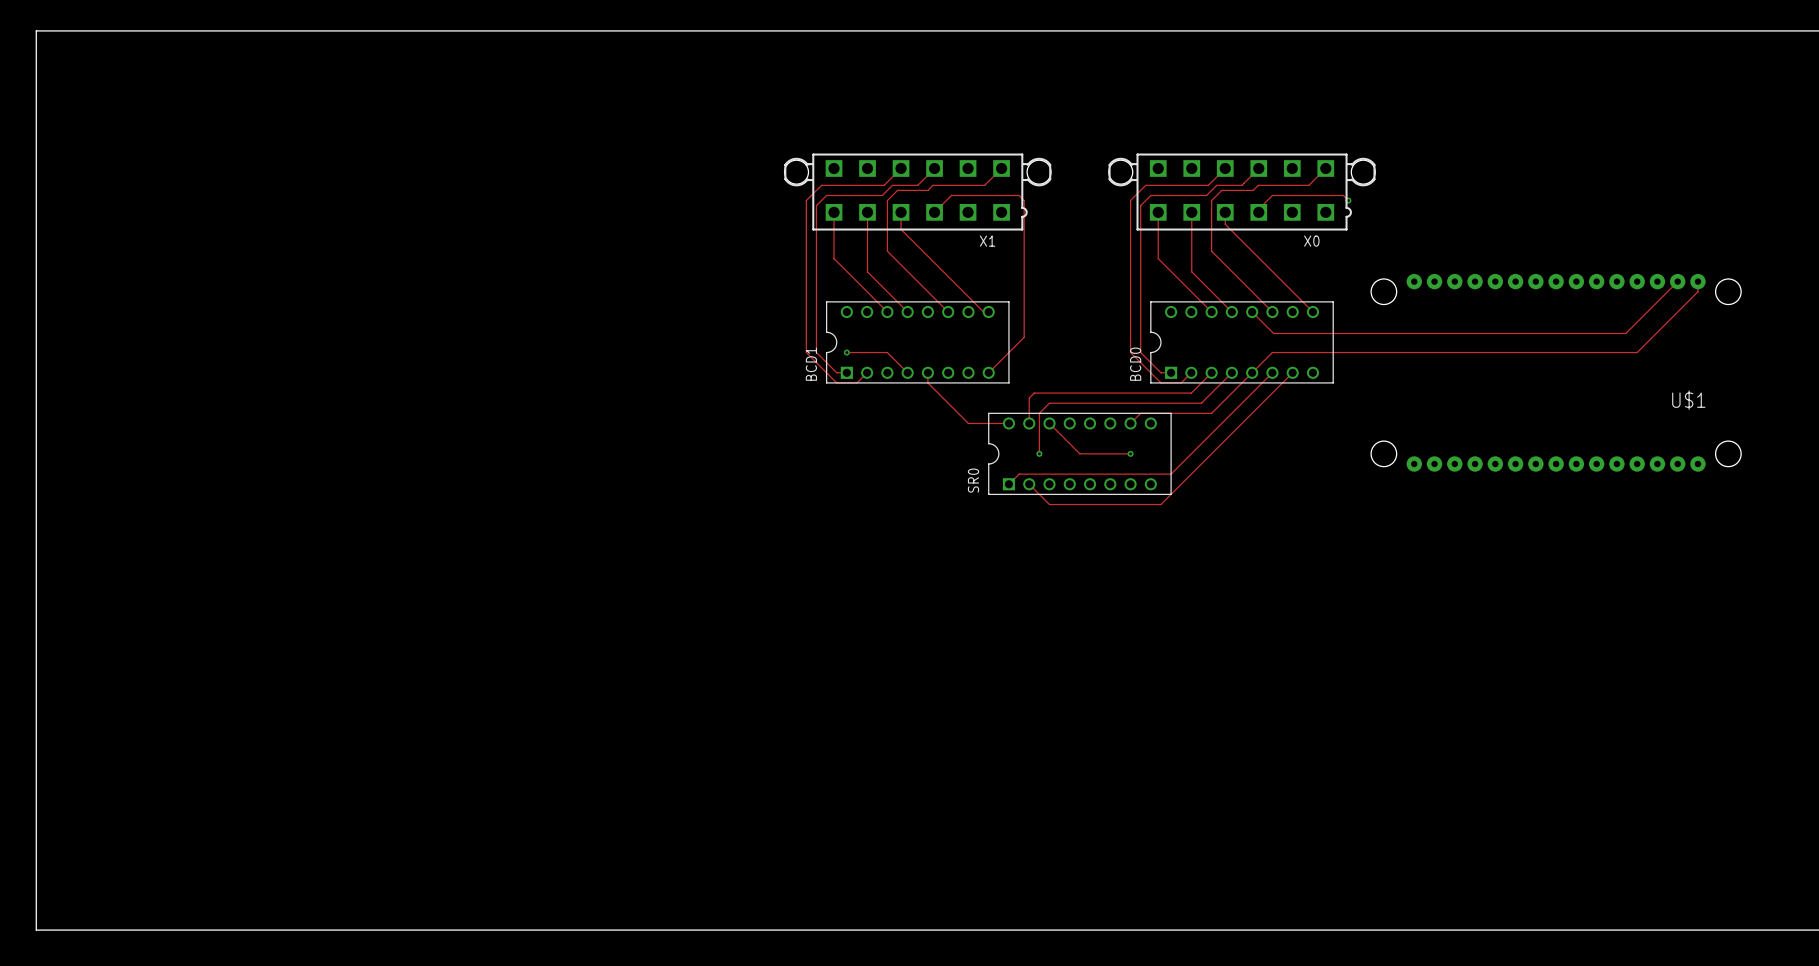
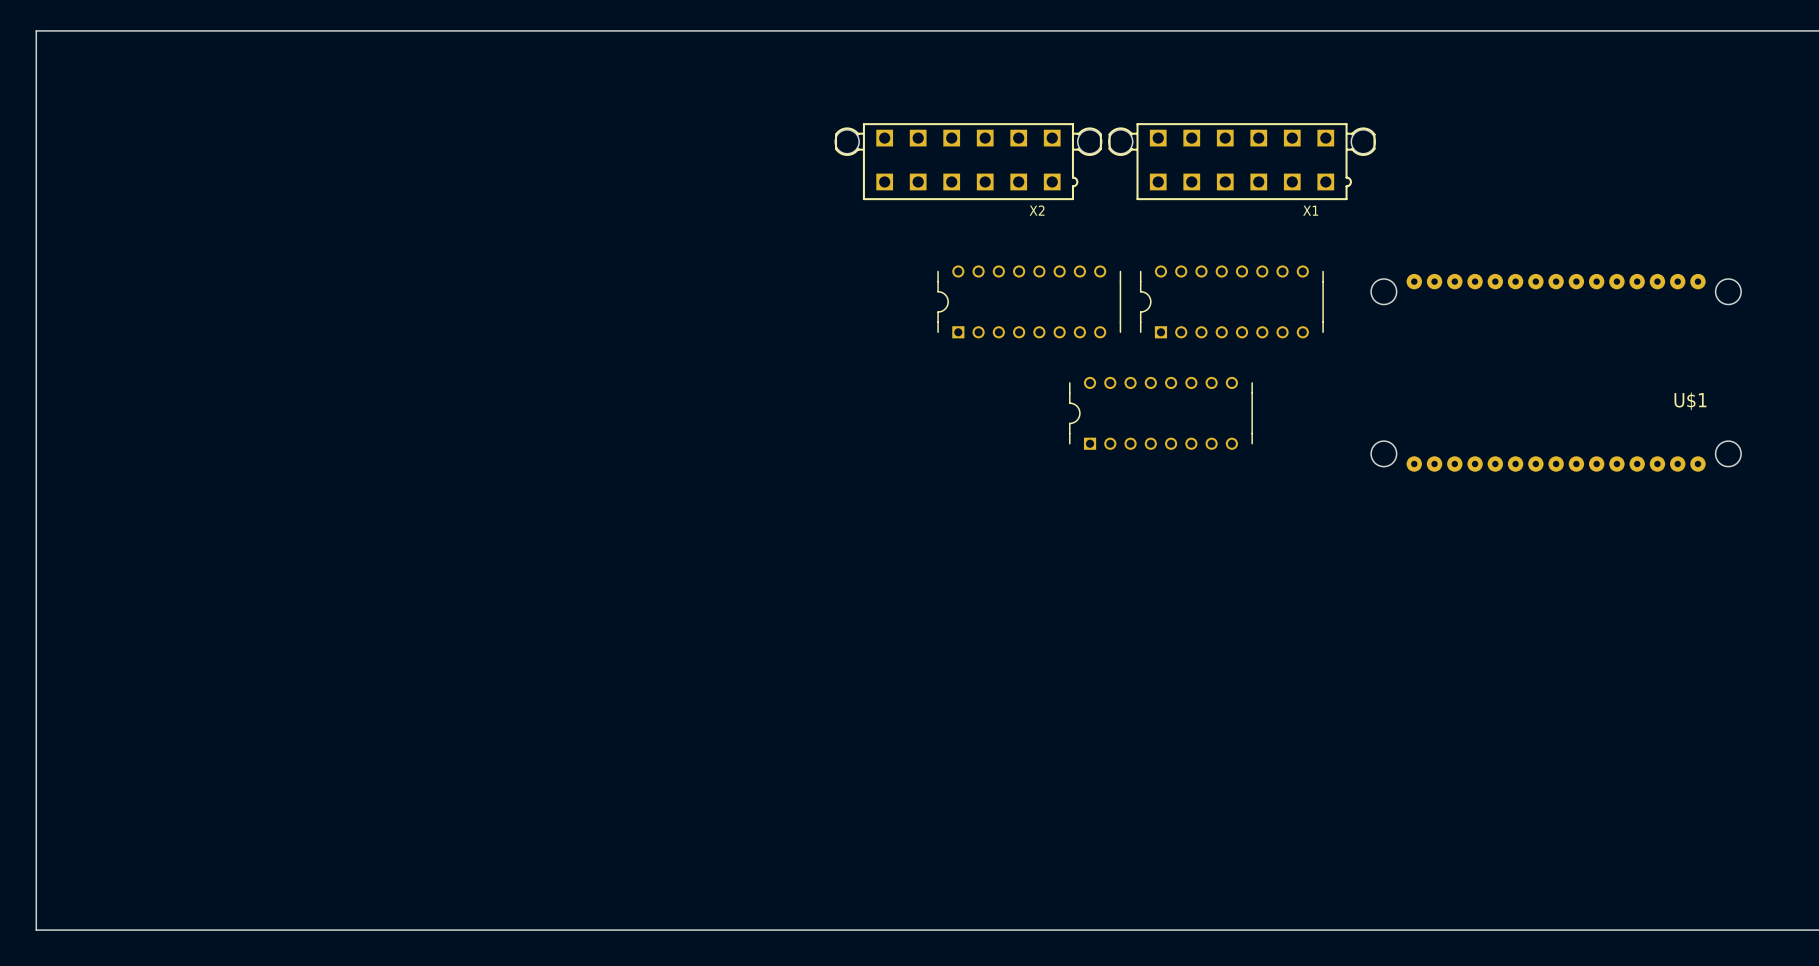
X2: none -> (968, 161)
track: (901, 168) (884, 185) (821, 185) (806, 200) (806, 352) (836, 382) (857, 382) (867, 372) -> none
track: (934, 168) (917, 185) (892, 185) (882, 195) (826, 195) (816, 205) (816, 352) (836, 372) (846, 372) -> none
track: (1001, 168) (984, 185) (932, 185) (927, 190) (897, 190) (887, 200) (887, 251) (948, 312) -> none
track: (1225, 168) (1208, 185) (1145, 185) (1130, 200) (1130, 352) (1160, 382) (1181, 382) (1191, 372) -> none
track: (1258, 168) (1244, 182) -> none
track: (1325, 168) (1308, 185) (1258, 185) (1253, 190) (1221, 190) (1211, 200) (1211, 251) (1272, 312) -> none
track: (1244, 183) (1242, 185) (1216, 185) (1206, 195) (1150, 195) (1140, 205) (1140, 352) (1160, 372) (1171, 372) -> none
X1 position: (917, 192) -> (1242, 161)
X0: (1242, 192) -> none
track: (1348, 200) (1343, 195) (1272, 195) (1258, 209) (1258, 212) -> none
via: (1348, 200) -> none
track: (834, 212) (834, 258) (887, 312) -> none
track: (867, 212) (867, 271) (907, 312) -> none
track: (901, 212) (901, 229) (983, 312) (988, 312) -> none
track: (934, 212) (951, 195) (1019, 195) (1024, 200) (1024, 337) (988, 372) -> none
track: (1158, 212) (1158, 258) (1211, 312) -> none
track: (1191, 212) (1191, 271) (1231, 312) -> none
track: (1225, 212) (1225, 224) (1312, 312) -> none
track: (1677, 281) (1625, 333) (1273, 333) (1252, 312) -> none
track: (1697, 281) (1697, 291) (1637, 352) (1272, 352) (1211, 413) (1140, 413) (1130, 423) -> none
part: none -> (1029, 301)
part: none -> (1231, 301)
BCD1: (917, 342) -> none
BCD0: (1242, 342) -> none
track: (846, 352) (887, 352) (907, 372) -> none
via: (846, 352) -> none
track: (927, 372) (927, 382) (968, 423) (1008, 423) -> none
track: (1211, 372) (1191, 393) (1034, 393) (1029, 398) (1029, 423) -> none
track: (1231, 372) (1201, 403) (1049, 403) (1039, 413) (1039, 453) -> none
track: (1272, 372) (1171, 474) (1019, 474) (1008, 484) -> none
track: (1292, 372) (1160, 504) (1049, 504) (1029, 484) -> none
part: none -> (1160, 413)
track: (1049, 423) (1079, 453) (1130, 453) -> none
via: (1039, 453) -> none
SR0: (1079, 453) -> none
via: (1130, 453) -> none

